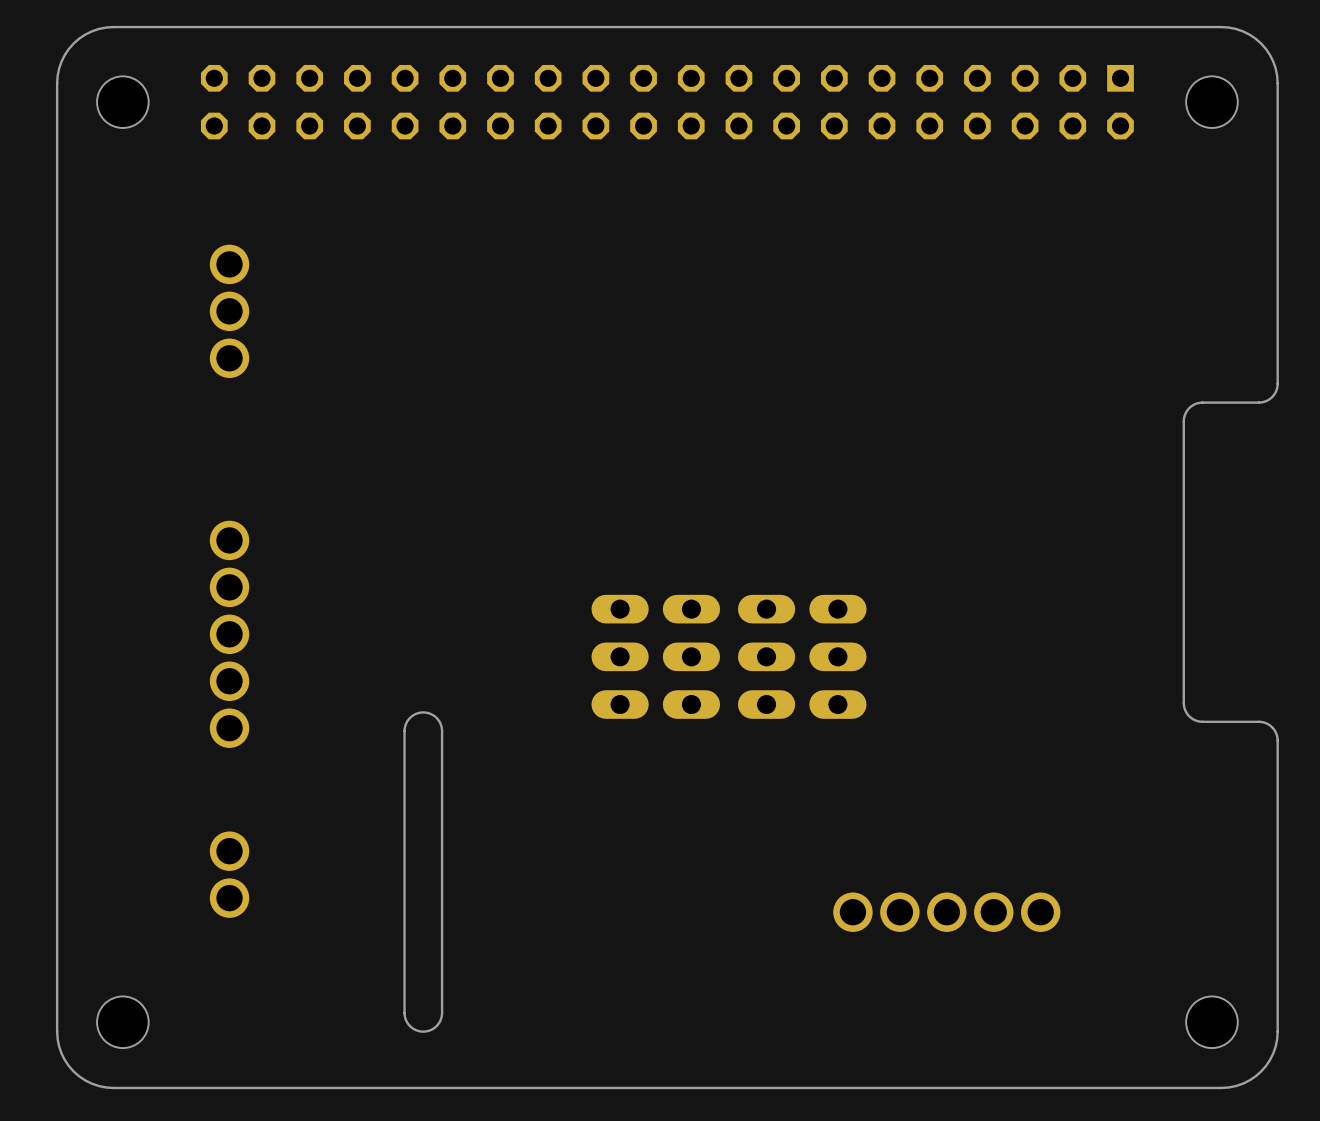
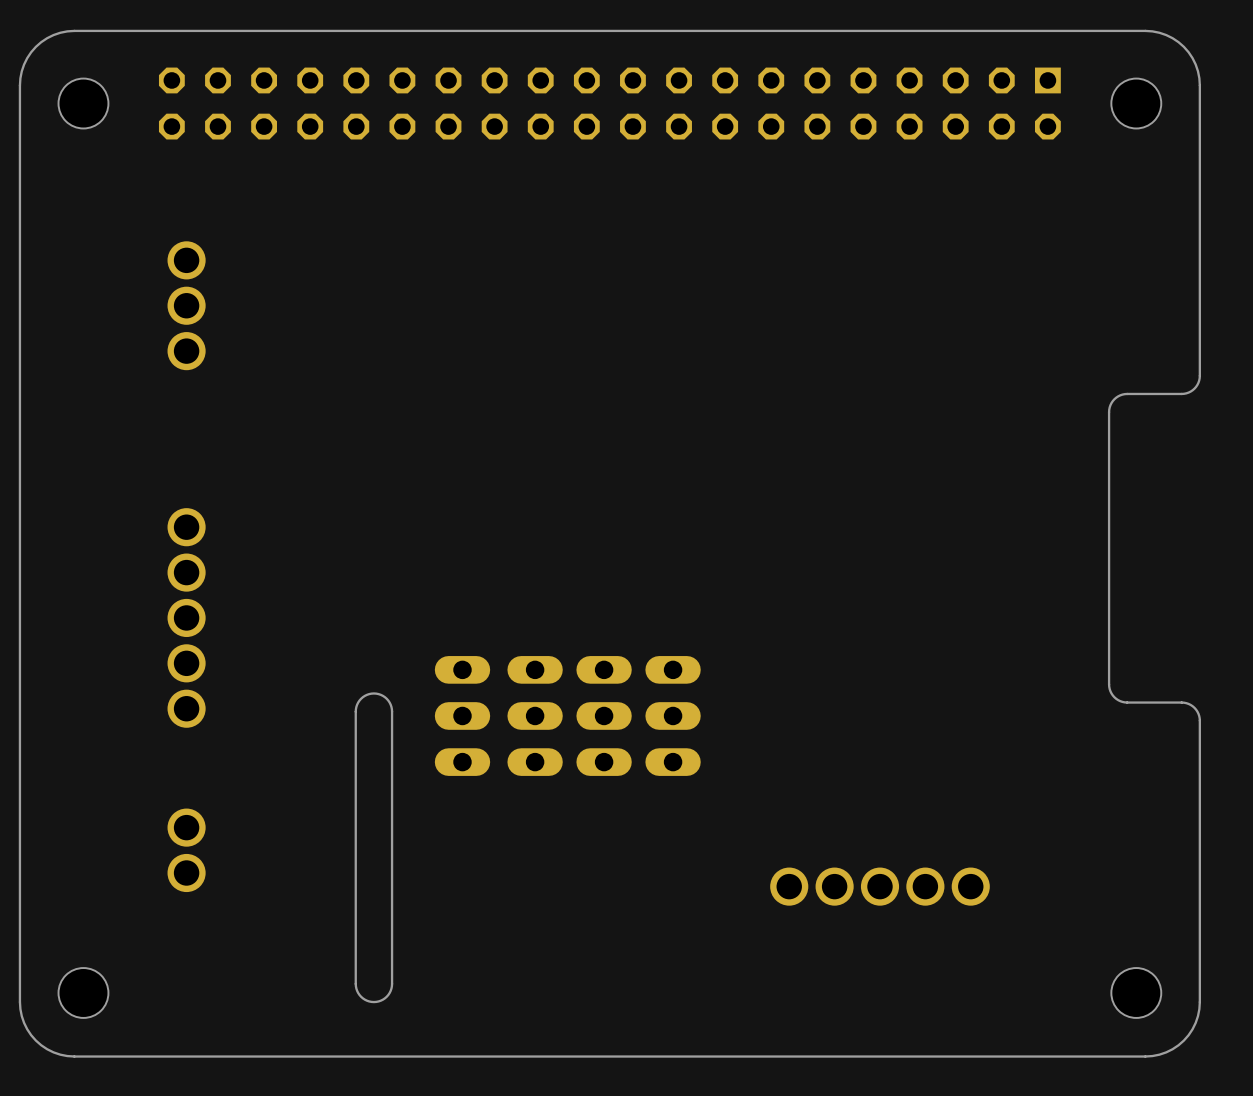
part: (620, 656) -> none
part: (691, 656) -> none
part: (766, 656) -> none
part: (837, 656) -> none
part: none -> (462, 715)
part: none -> (535, 715)
part: none -> (604, 715)
part: none -> (673, 715)

